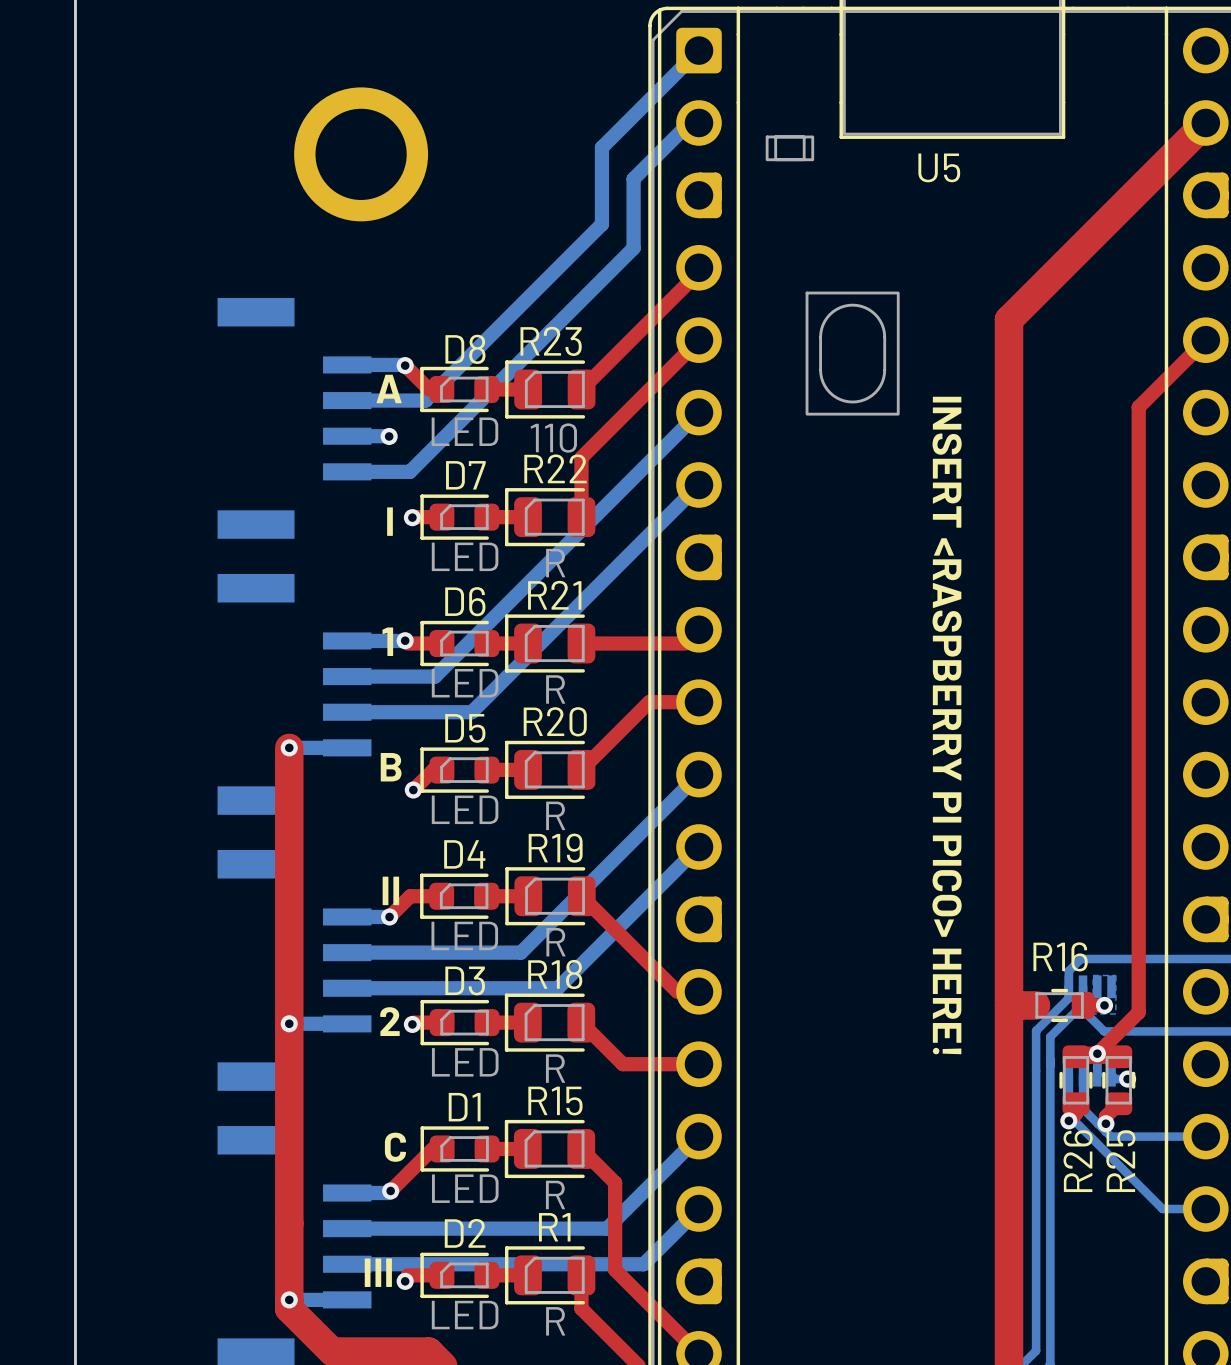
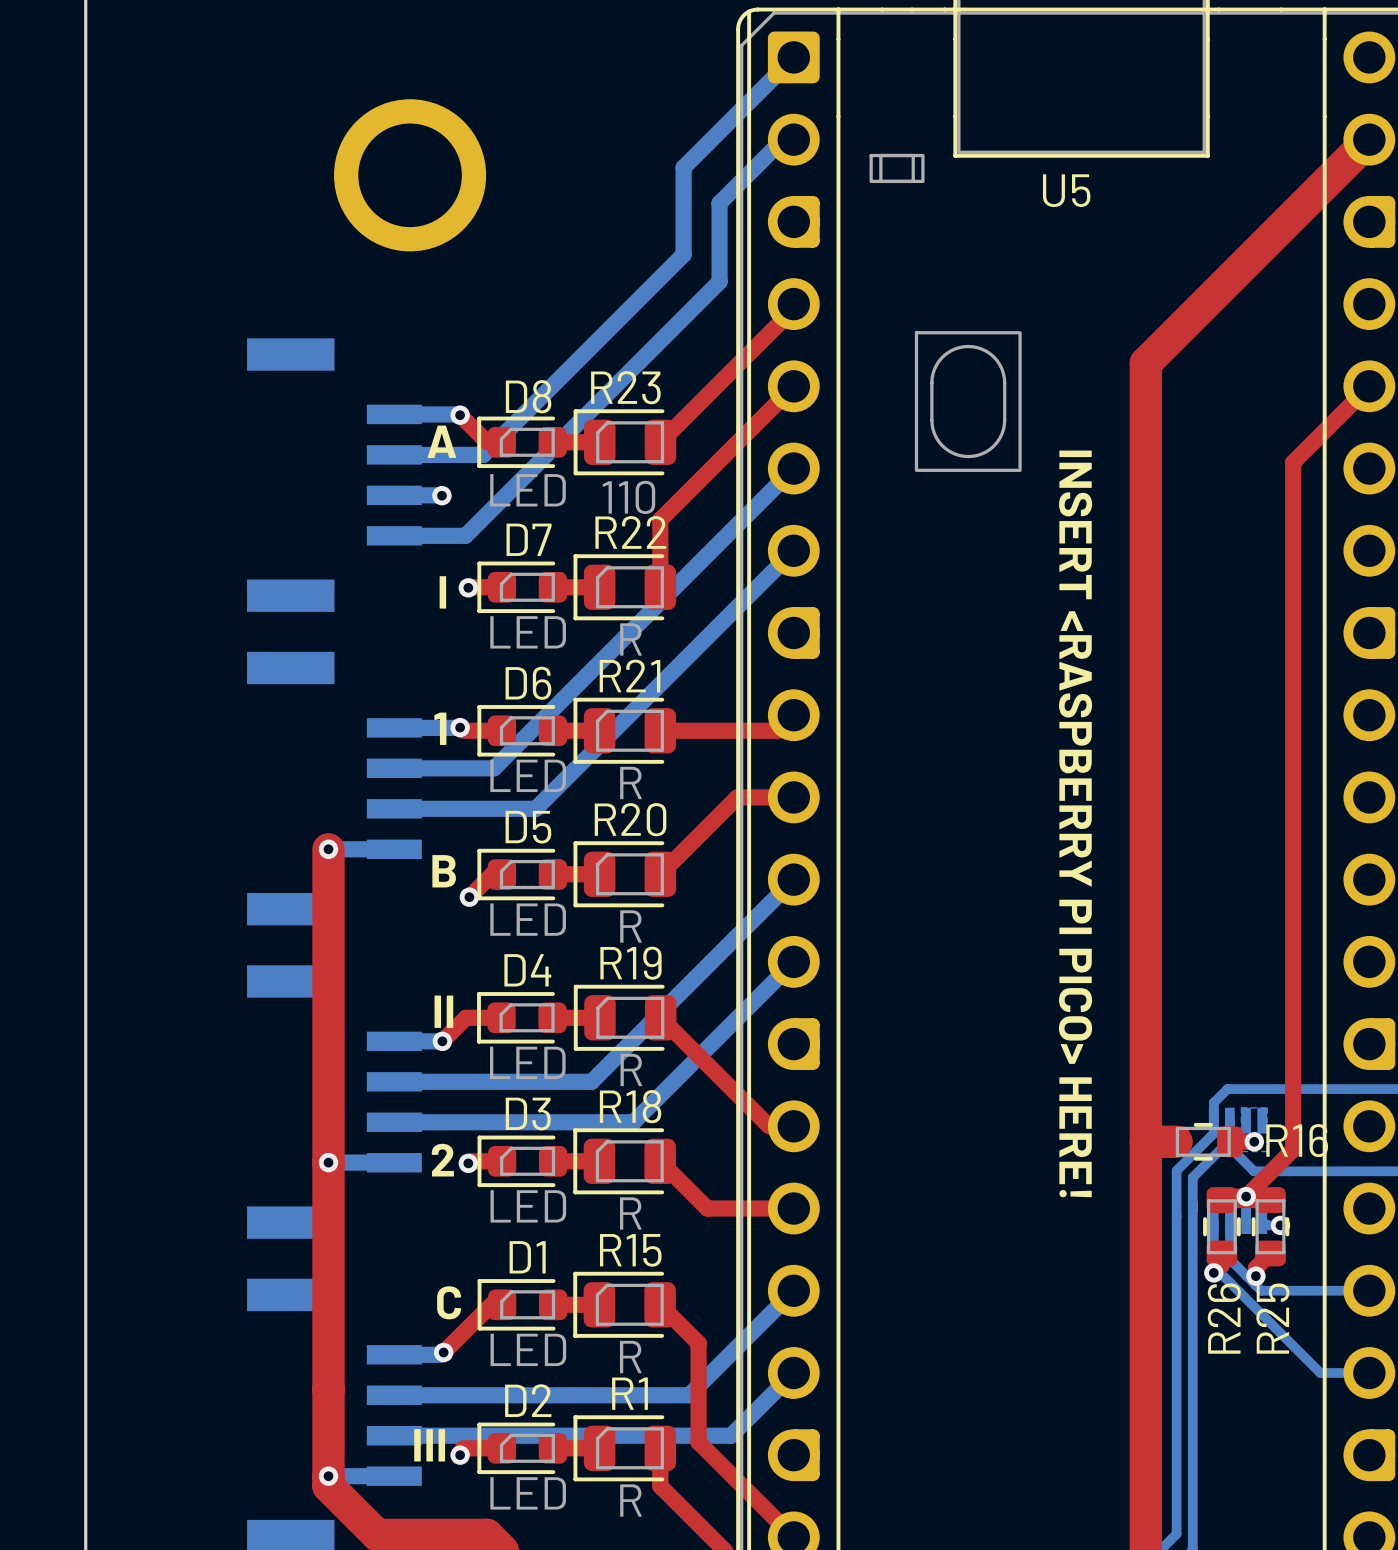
R16 name position: R16 (1060, 956) -> R16 (1297, 1140)

